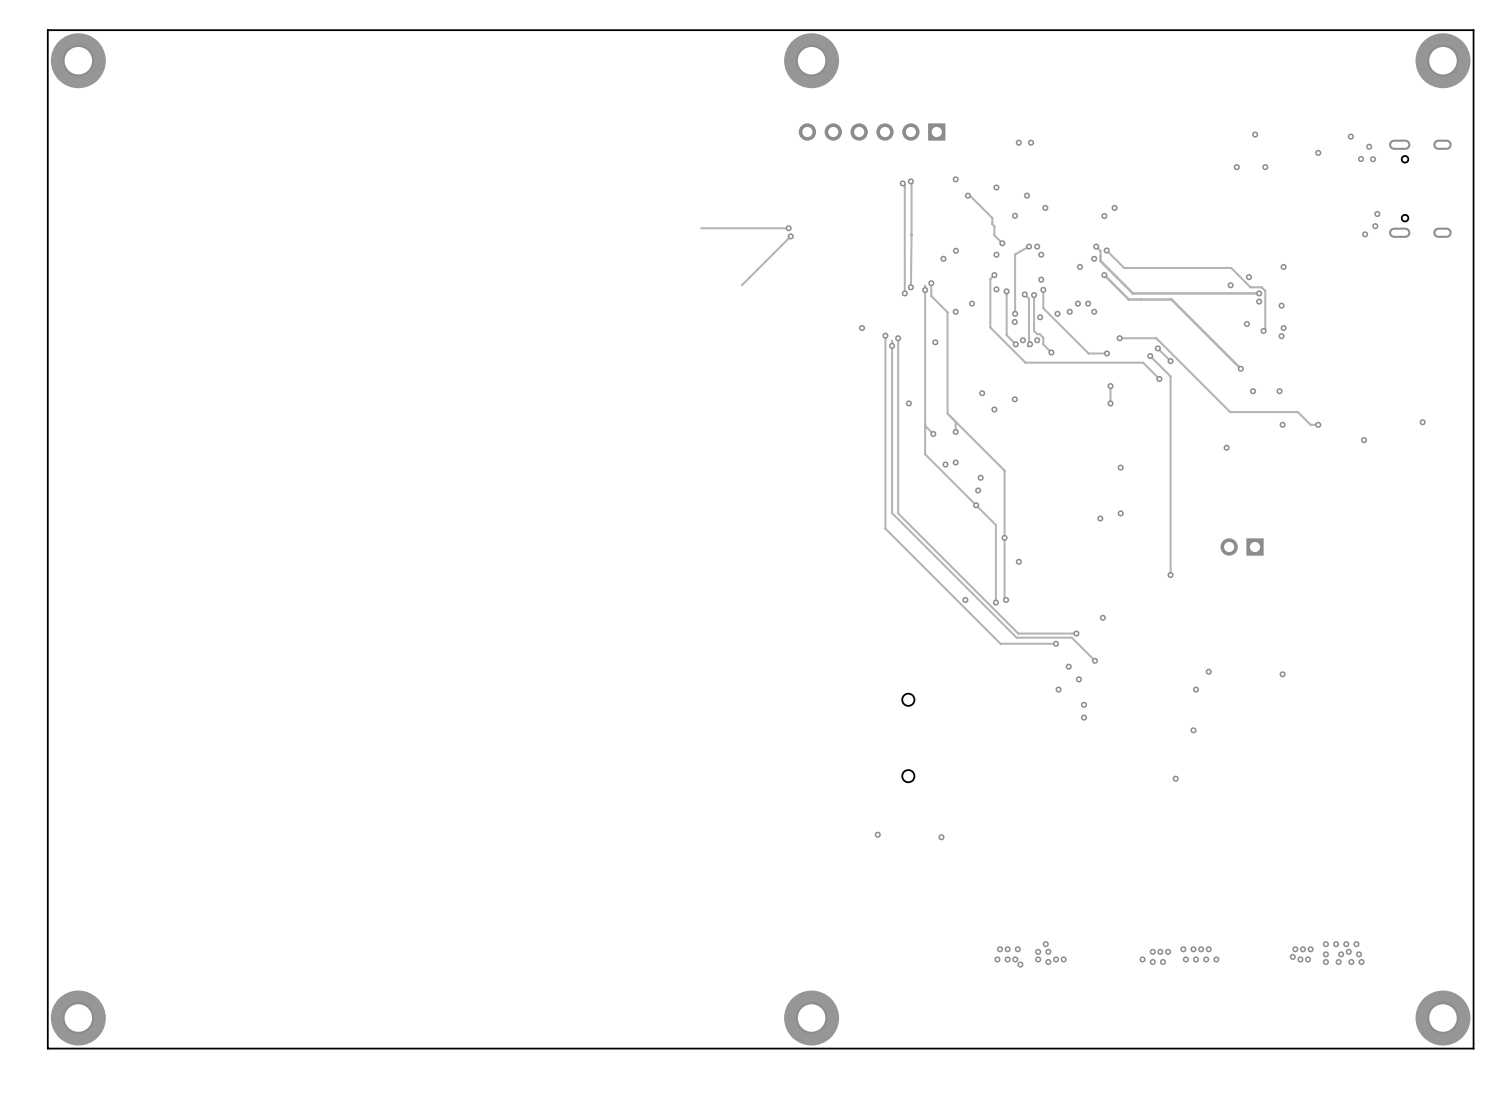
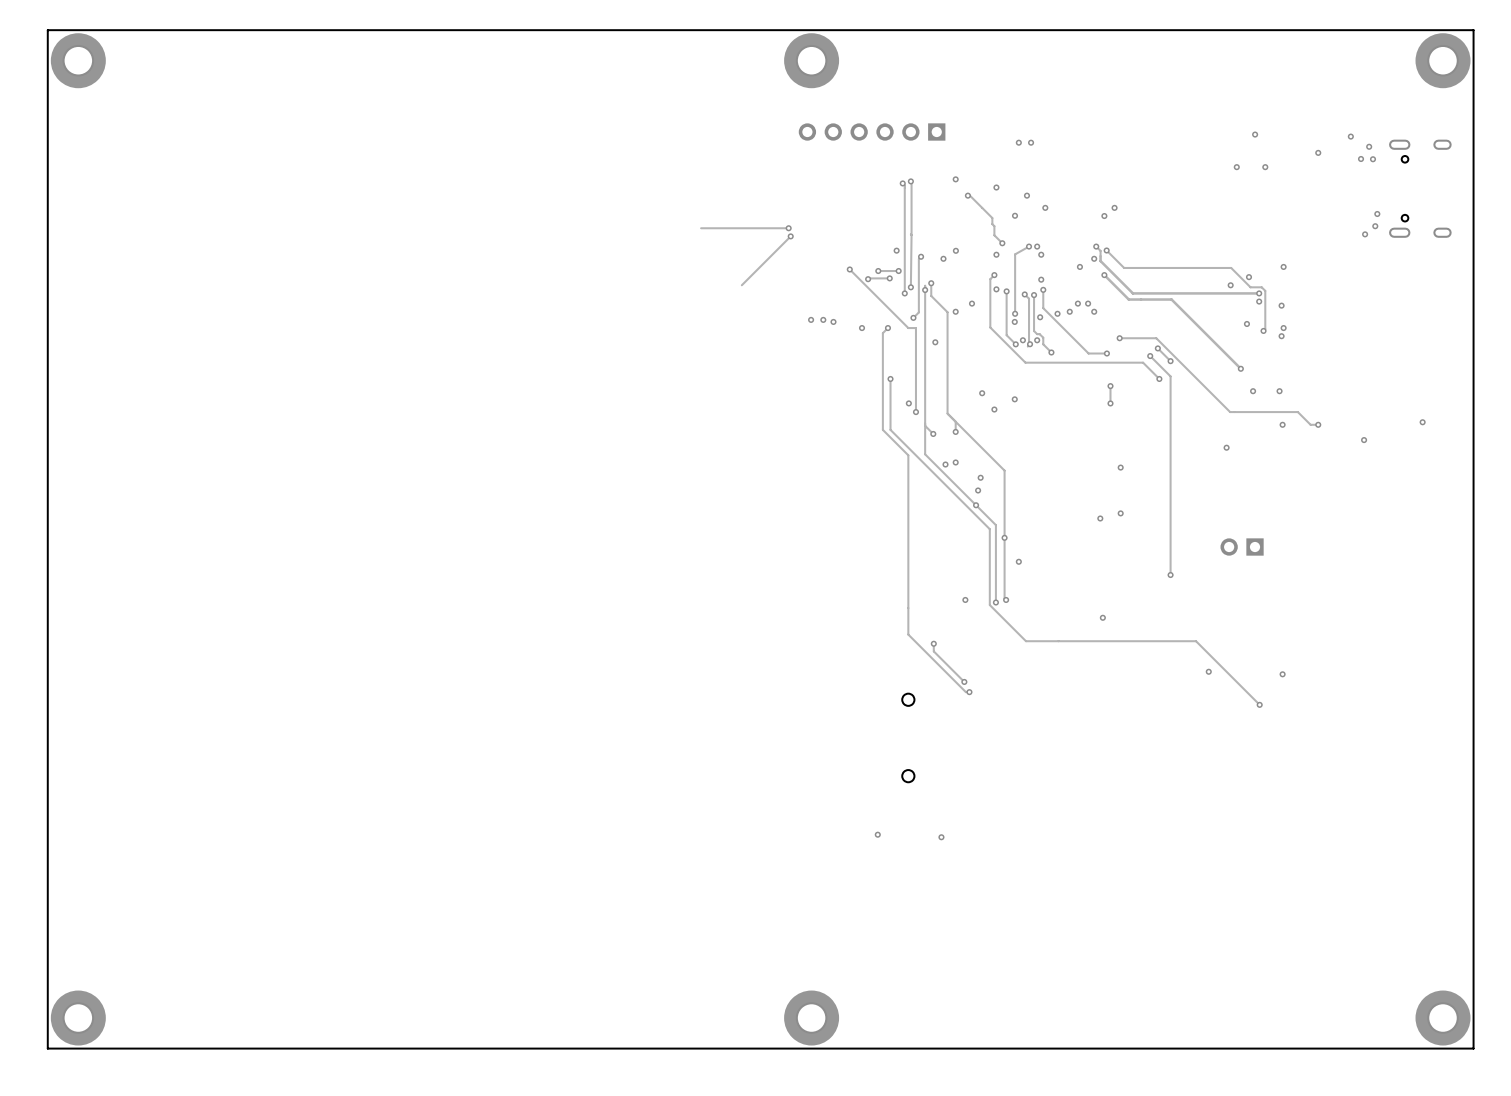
via: none -> (896, 250)
track: none -> (921, 256) (918, 258) (918, 312) (913, 317)
via: none -> (921, 256)
track: none -> (849, 269) (908, 328) (915, 328) (915, 412)
via: none -> (849, 269)
via: none -> (878, 271)
track: none -> (898, 271) (878, 271)
via: none -> (898, 271)
track: none -> (889, 278) (868, 279)
via: none -> (889, 278)
via: none -> (868, 279)
via: none -> (913, 317)
via: none -> (811, 319)
via: none -> (823, 319)
via: none -> (833, 321)
track: none -> (887, 328) (882, 333) (882, 429) (908, 455) (908, 634) (965, 692) (969, 692)
via: none -> (887, 328)
track: (885, 335) (885, 528) (1000, 643) (1056, 643) -> none
via: (885, 335) -> none
track: (898, 338) (898, 513) (989, 605) -> (890, 378) (890, 429) (989, 529) (989, 605)
via: (898, 338) -> none
track: (892, 340) (892, 513) (1016, 637) (1071, 637) (1094, 660) -> none
via: (892, 345) -> none
via: none -> (890, 378)
via: none -> (915, 412)
track: (1076, 633) (1018, 633) -> (1259, 704) (1196, 641) (1025, 641) (1018, 633)
via: (1076, 633) -> none
track: none -> (933, 643) (933, 651) (964, 681)
via: none -> (933, 643)
via: (1056, 643) -> none
via: (1094, 660) -> none
via: (1068, 666) -> none
via: (1078, 679) -> none
via: none -> (964, 681)
via: (1058, 689) -> none
via: (1196, 689) -> none
via: none -> (969, 692)
via: (1084, 704) -> none
via: none -> (1259, 704)
via: (1084, 717) -> none
via: (1193, 730) -> none
via: (1175, 778) -> none
via: (1045, 944) -> none
via: (1325, 944) -> none
via: (1336, 944) -> none
via: (1346, 944) -> none
via: (1356, 944) -> none
via: (1000, 949) -> none
via: (1007, 949) -> none
via: (1017, 949) -> none
via: (1183, 949) -> none
via: (1193, 949) -> none
via: (1201, 949) -> none
via: (1208, 949) -> none
via: (1295, 949) -> none
via: (1302, 949) -> none
via: (1310, 949) -> none
via: (1038, 951) -> none
via: (1048, 951) -> none
via: (1152, 951) -> none
via: (1160, 951) -> none
via: (1168, 951) -> none
via: (1348, 951) -> none
via: (1325, 954) -> none
via: (1341, 954) -> none
via: (1358, 954) -> none
via: (1292, 956) -> none
via: (997, 959) -> none
via: (1007, 959) -> none
via: (1015, 959) -> none
via: (1038, 959) -> none
via: (1056, 959) -> none
via: (1063, 959) -> none
via: (1142, 959) -> none
via: (1185, 959) -> none
via: (1196, 959) -> none
via: (1206, 959) -> none
via: (1216, 959) -> none
via: (1300, 959) -> none
via: (1308, 959) -> none
via: (1048, 962) -> none
via: (1152, 962) -> none
via: (1162, 962) -> none
via: (1325, 962) -> none
via: (1338, 962) -> none
via: (1351, 962) -> none
via: (1361, 962) -> none
via: (1020, 964) -> none

